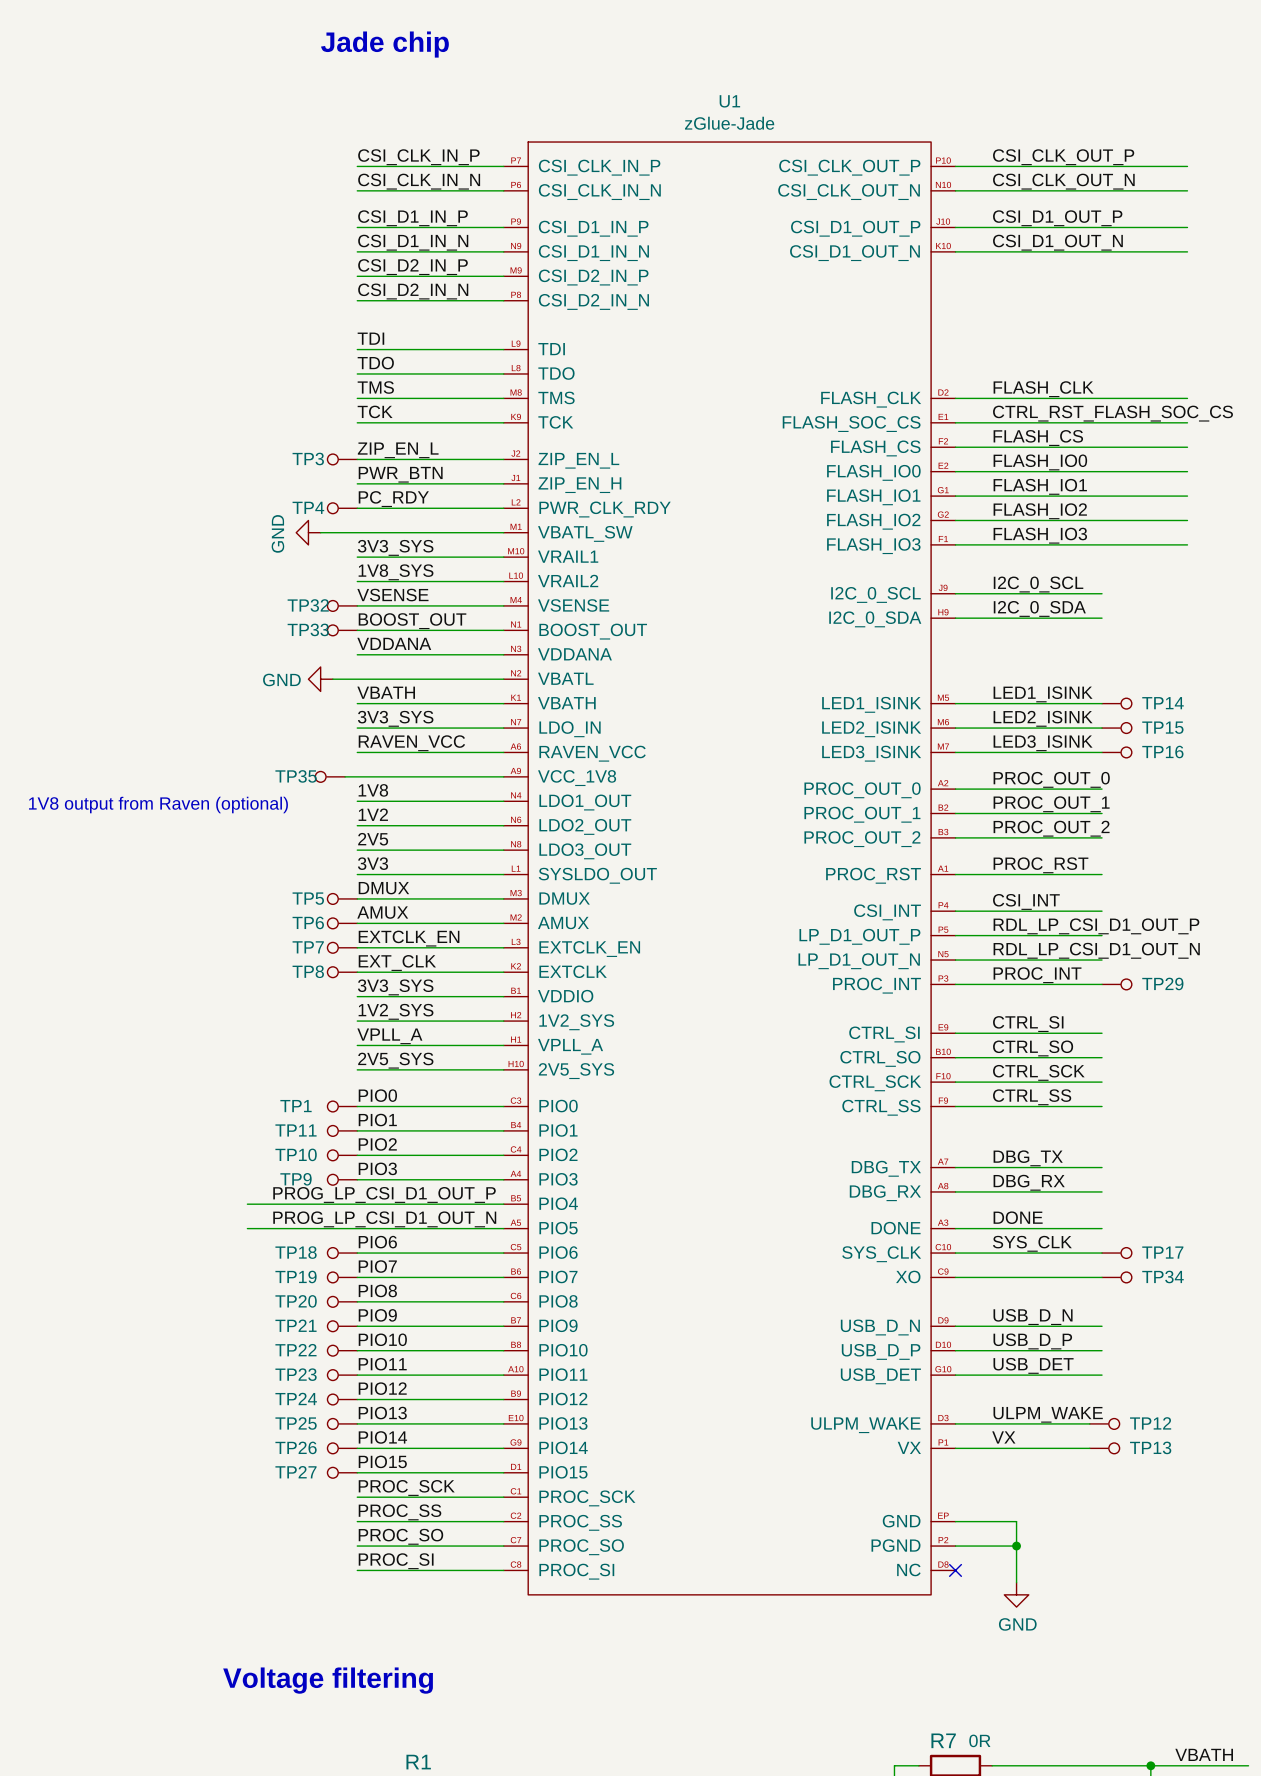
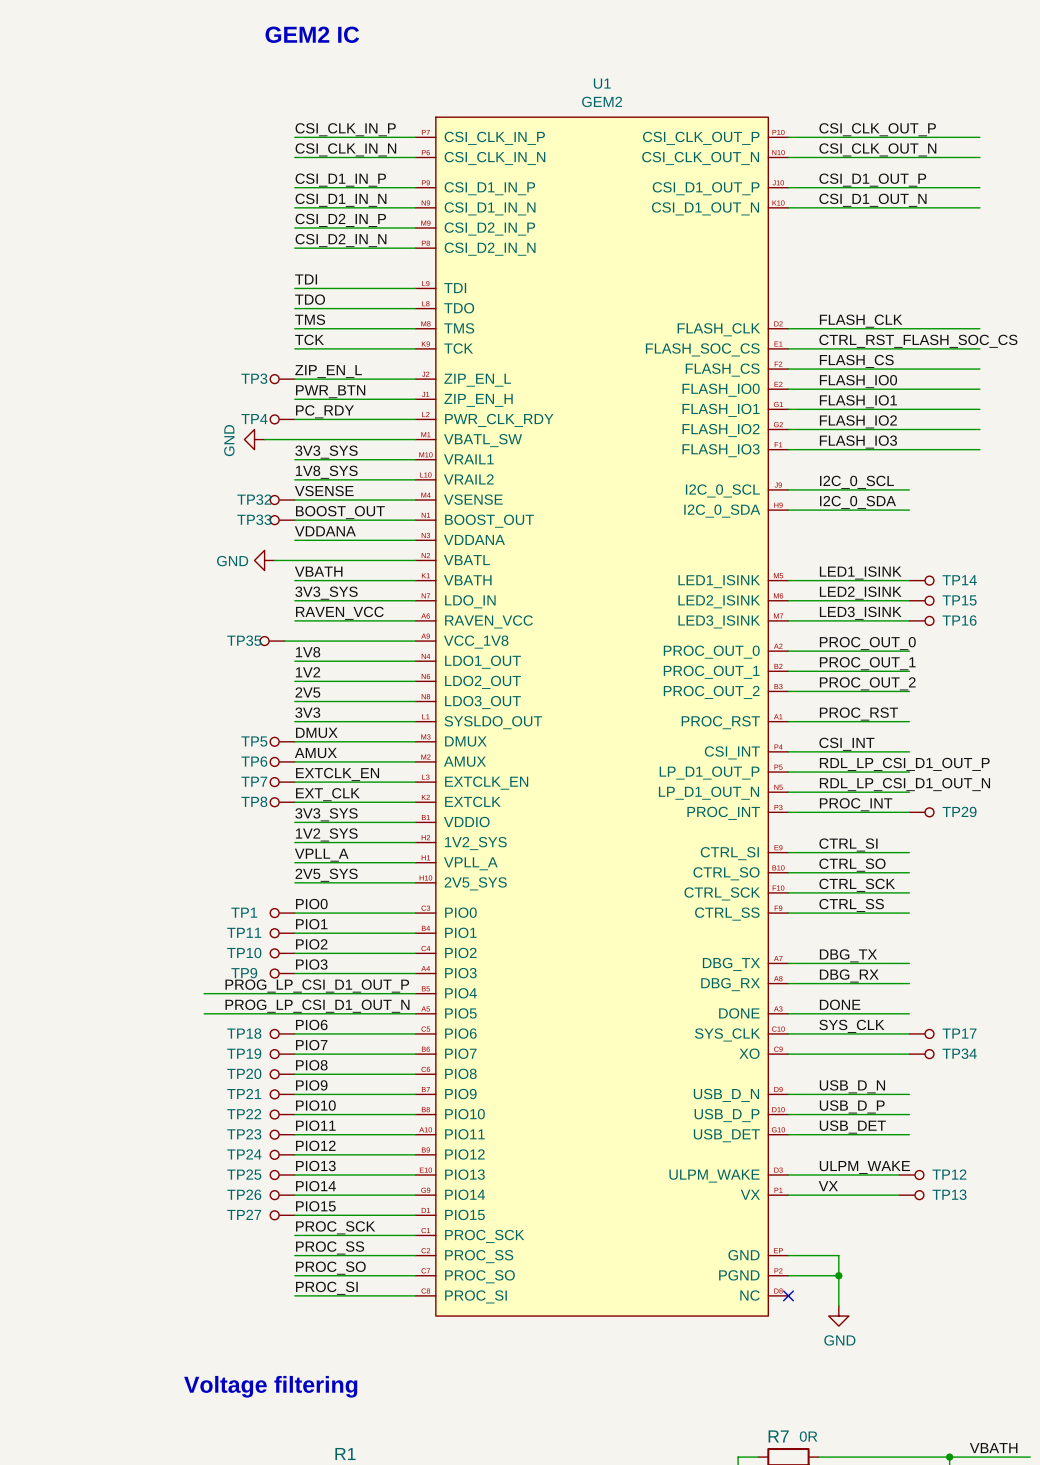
text: Jade chip (384, 44) -> GEM2 IC (312, 34)
U1 value: zGlue-Jade (729, 123) -> GEM2 (602, 101)
U1 symbol: [503, 142, 956, 1595] -> [415, 117, 789, 1317]
text: 1V8 output from Raven (optional) (158, 805) -> none

